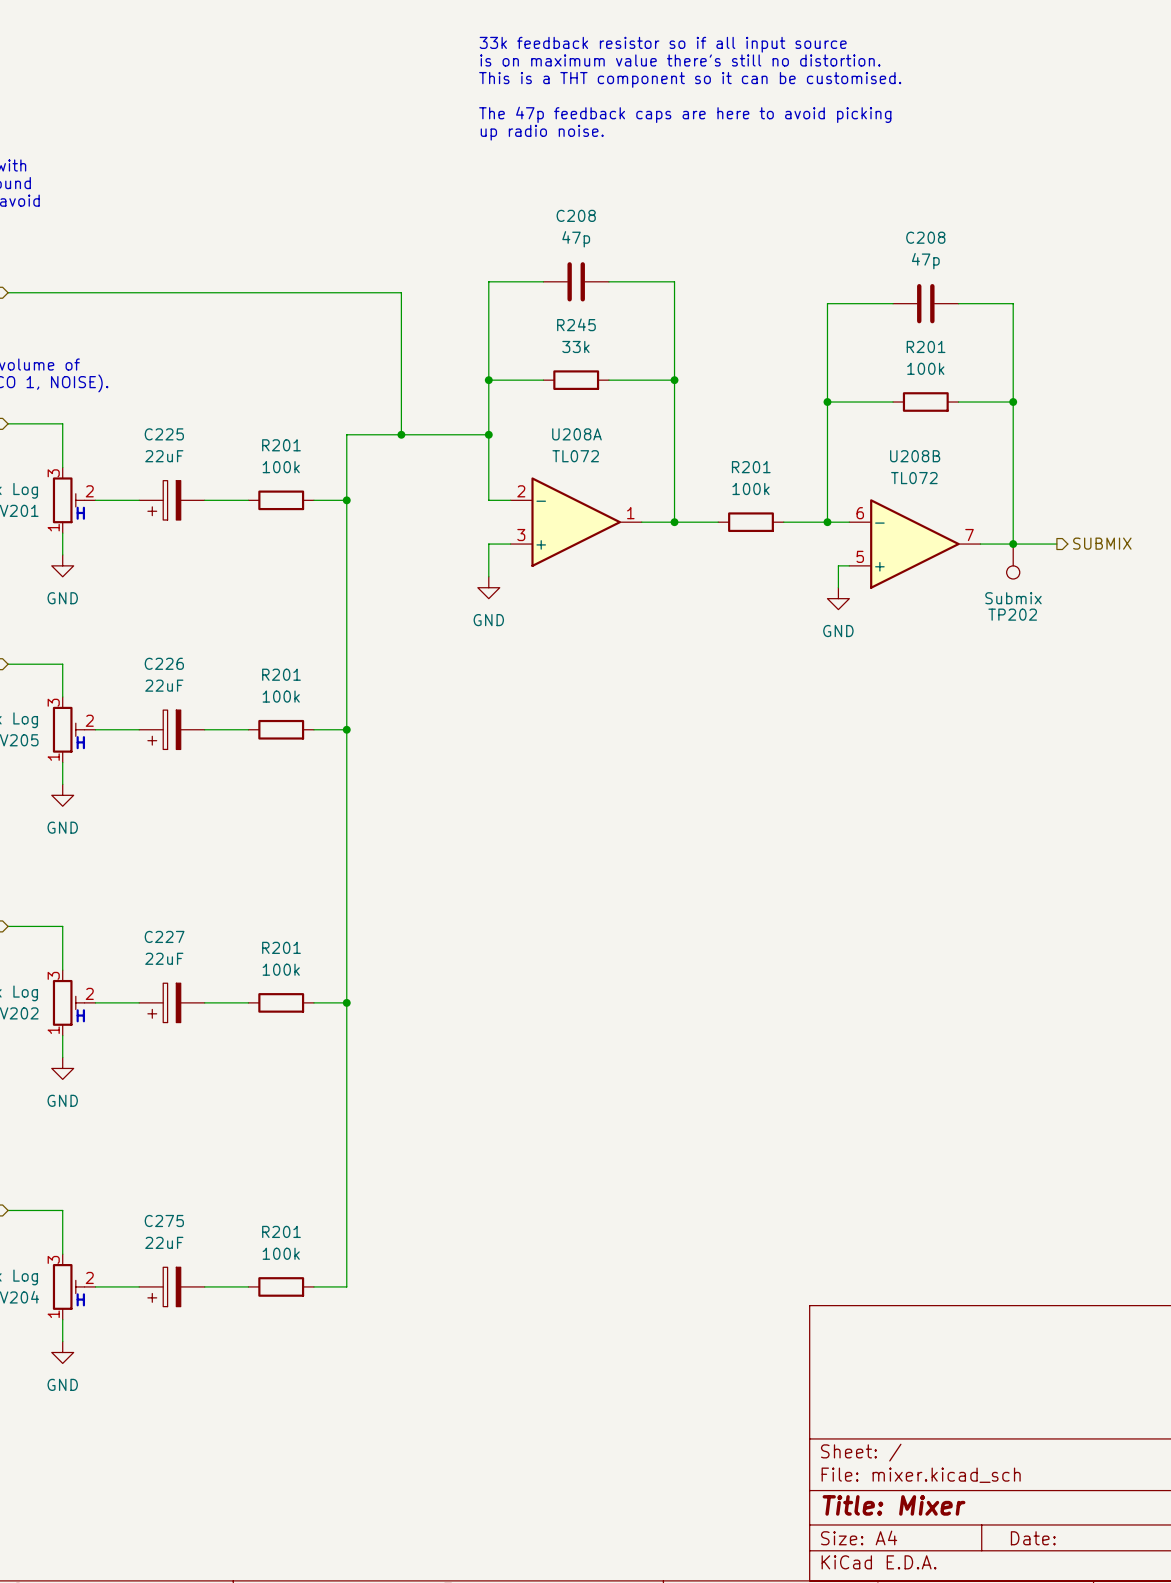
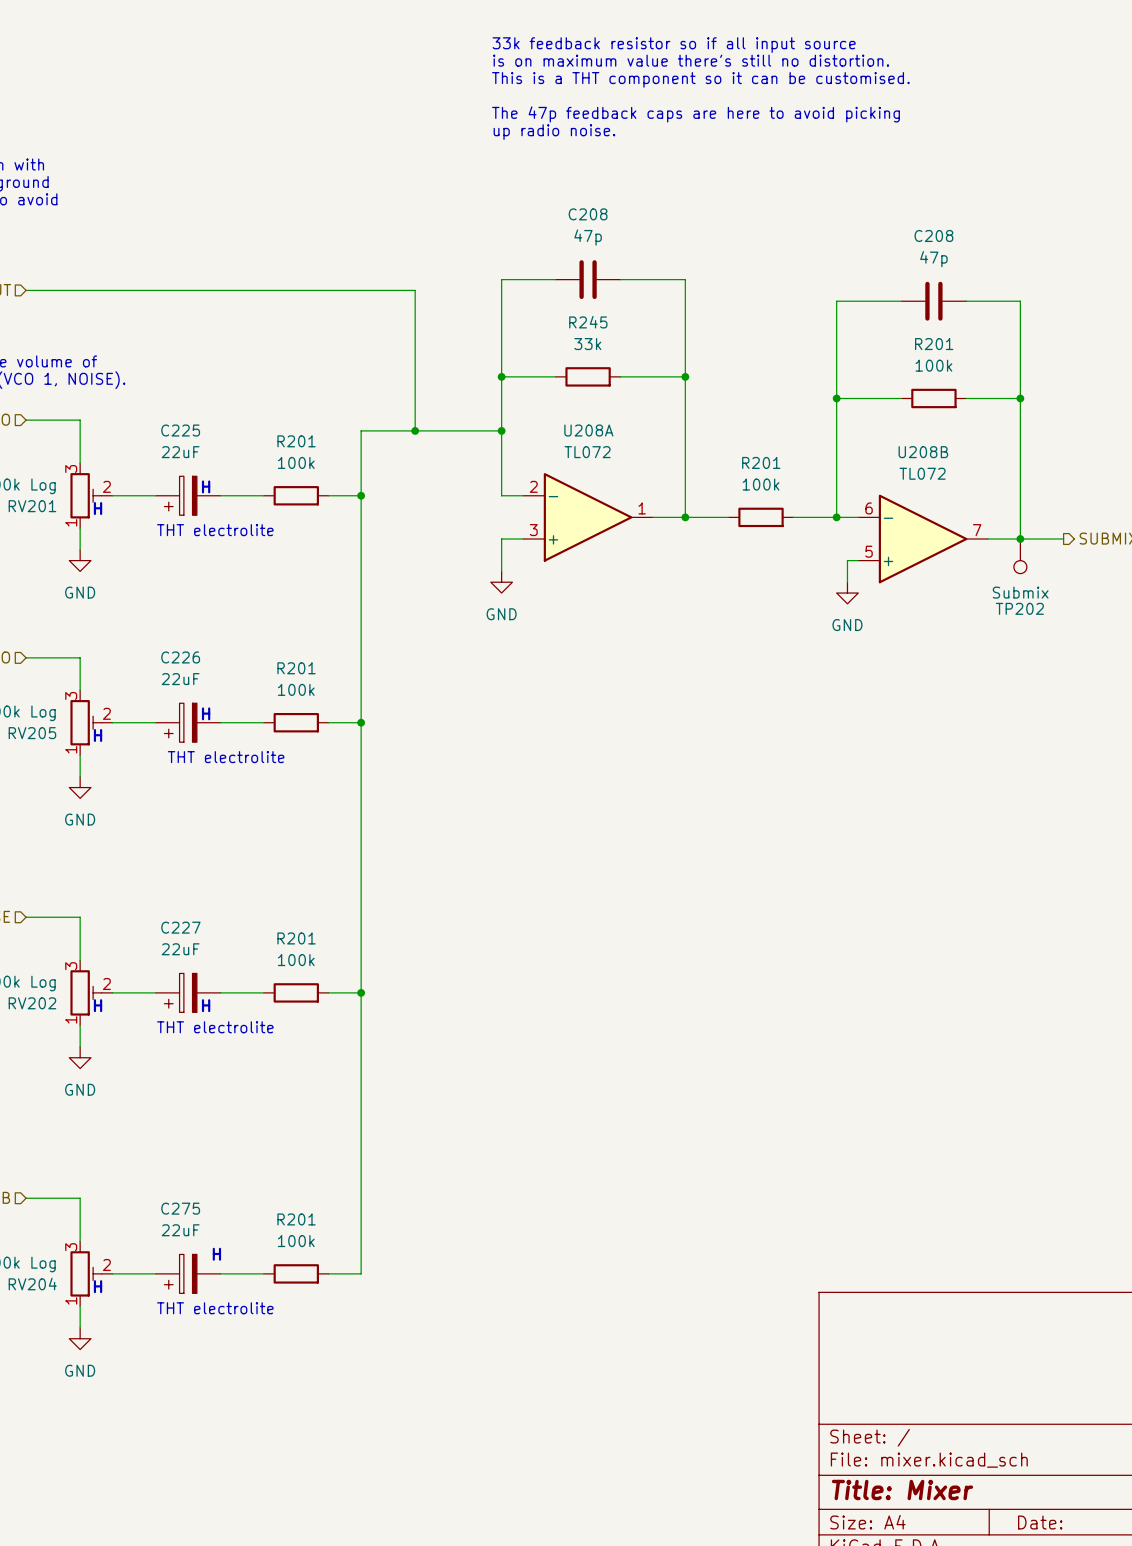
text: none -> H (206, 486)
text: none -> THT electrolite (215, 530)
text: none -> H (206, 713)
text: none -> THT electrolite (226, 757)
text: none -> H (206, 1005)
text: none -> THT electrolite (215, 1027)
text: none -> H (216, 1254)
text: none -> THT electrolite (215, 1308)

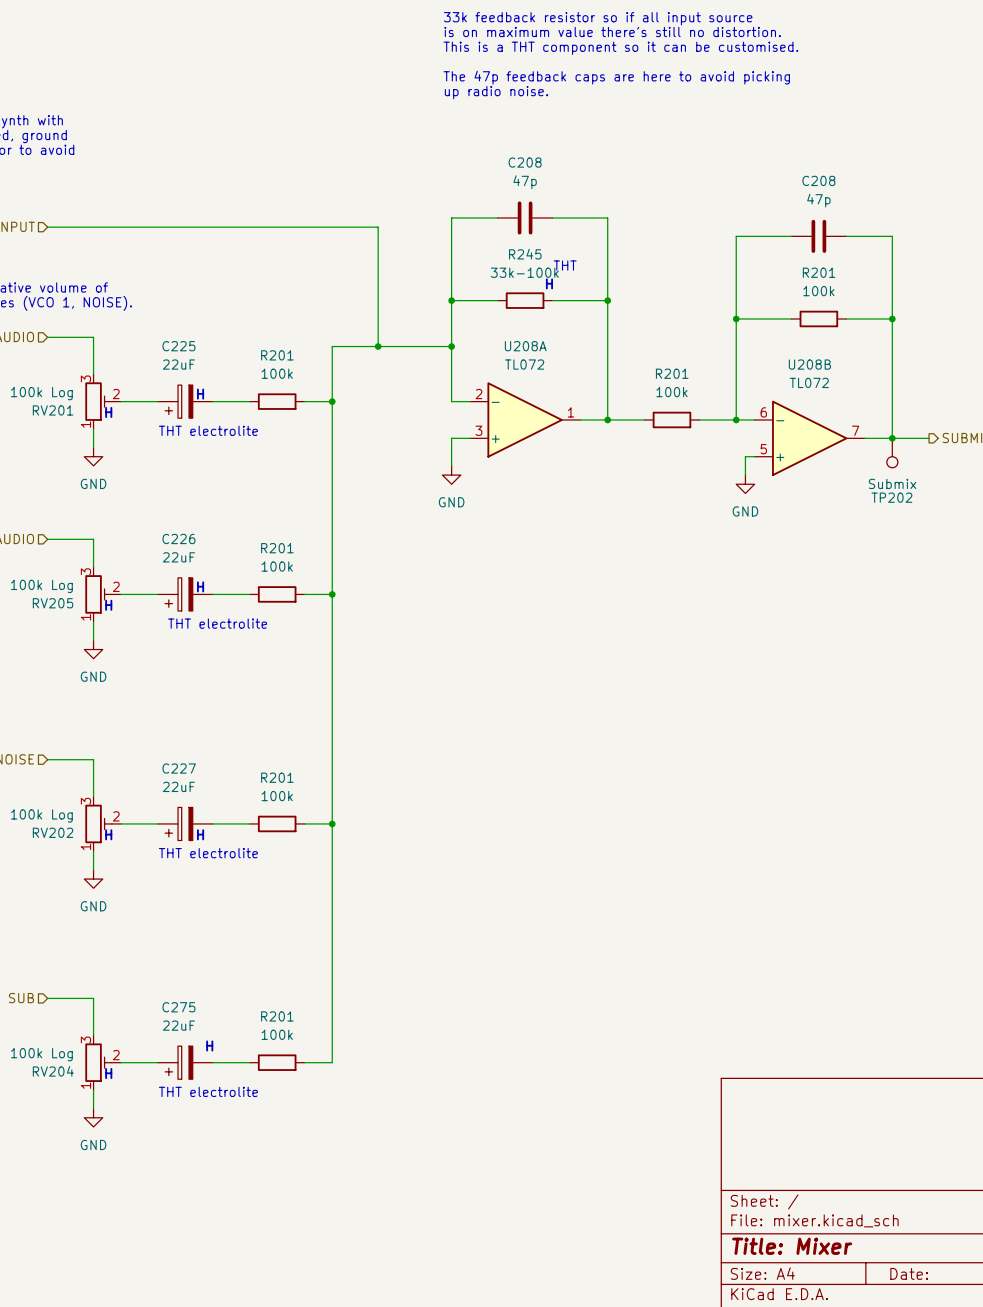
text: none -> THT (565, 265)
R245 value: 33k (587, 344) -> 33k-100k (524, 272)
text: none -> H (549, 283)

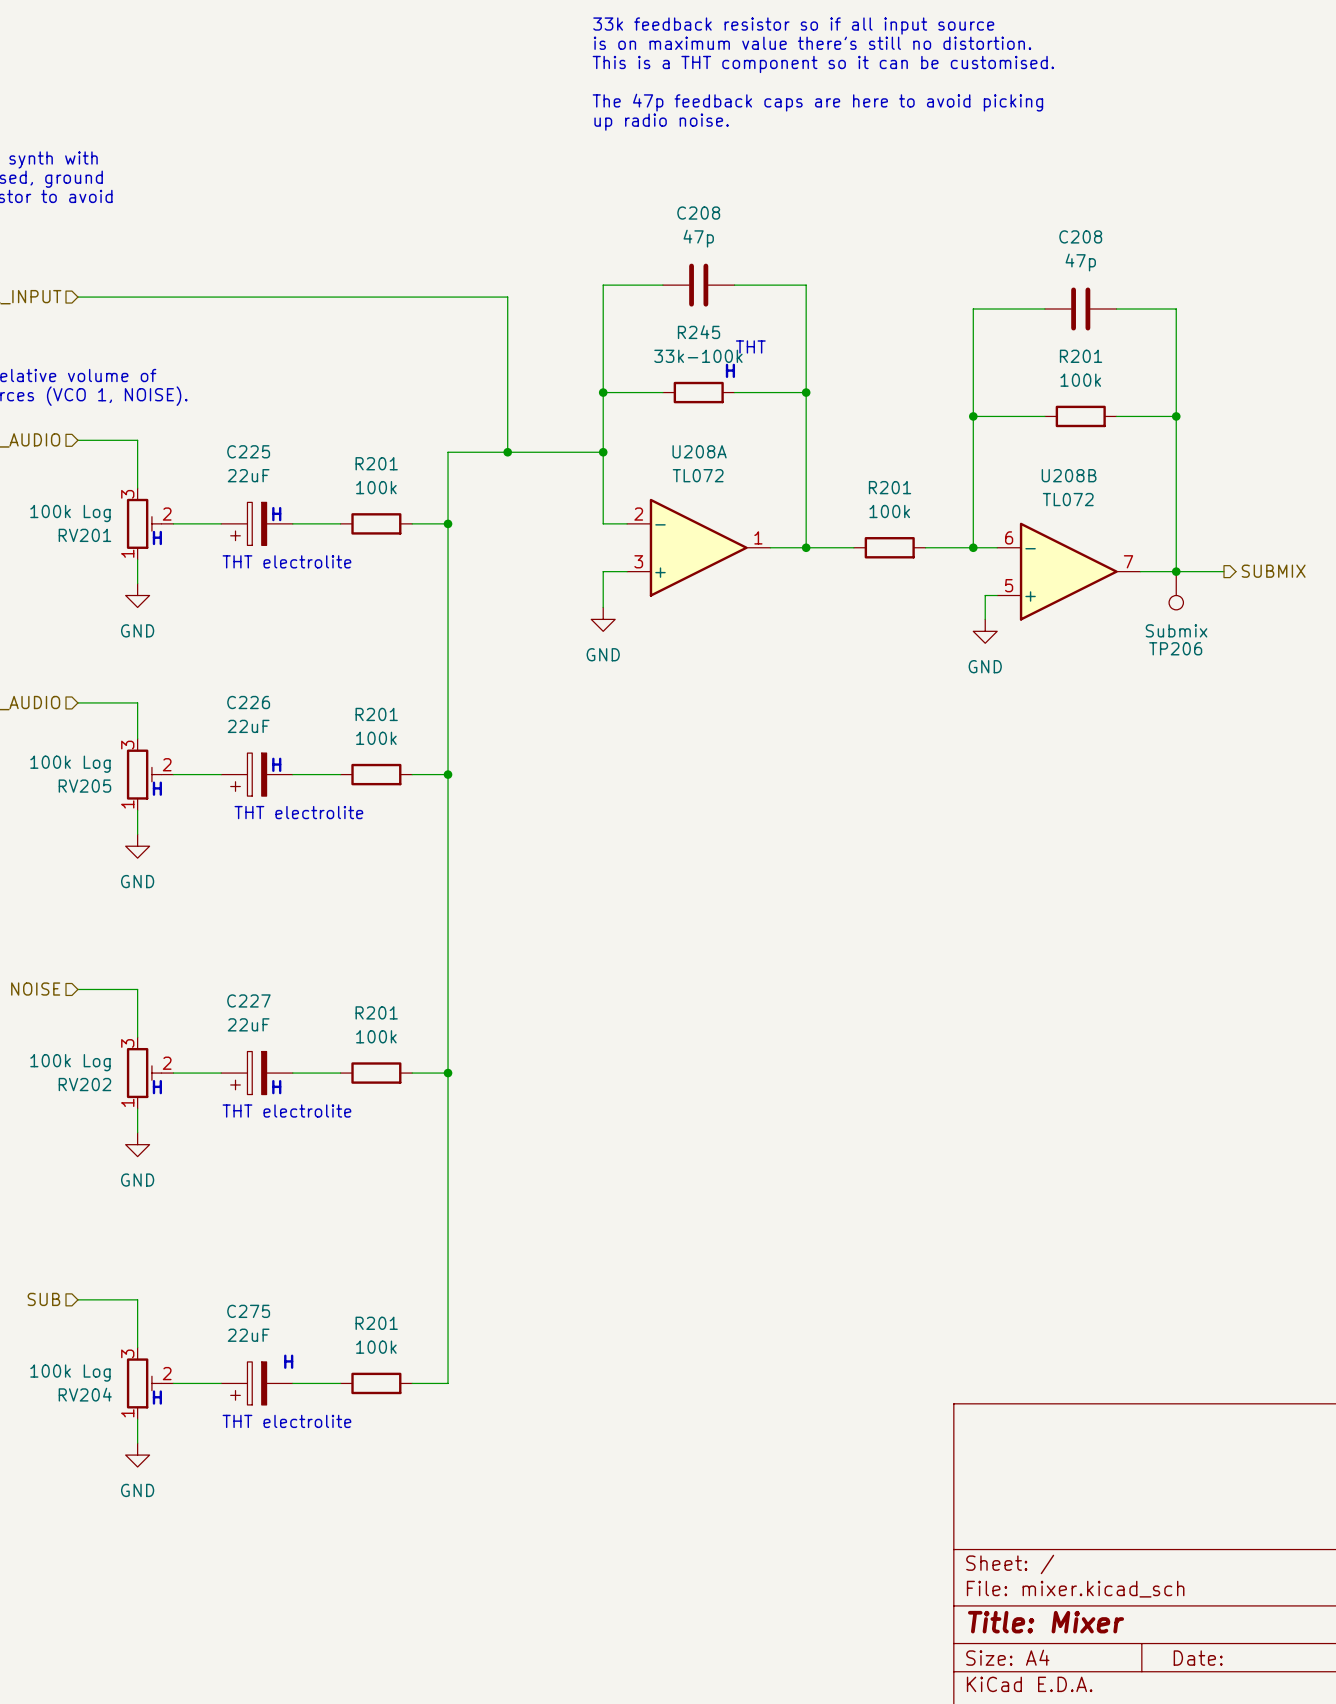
TP202 name: TP202 (891, 497) -> TP206 (1175, 648)

